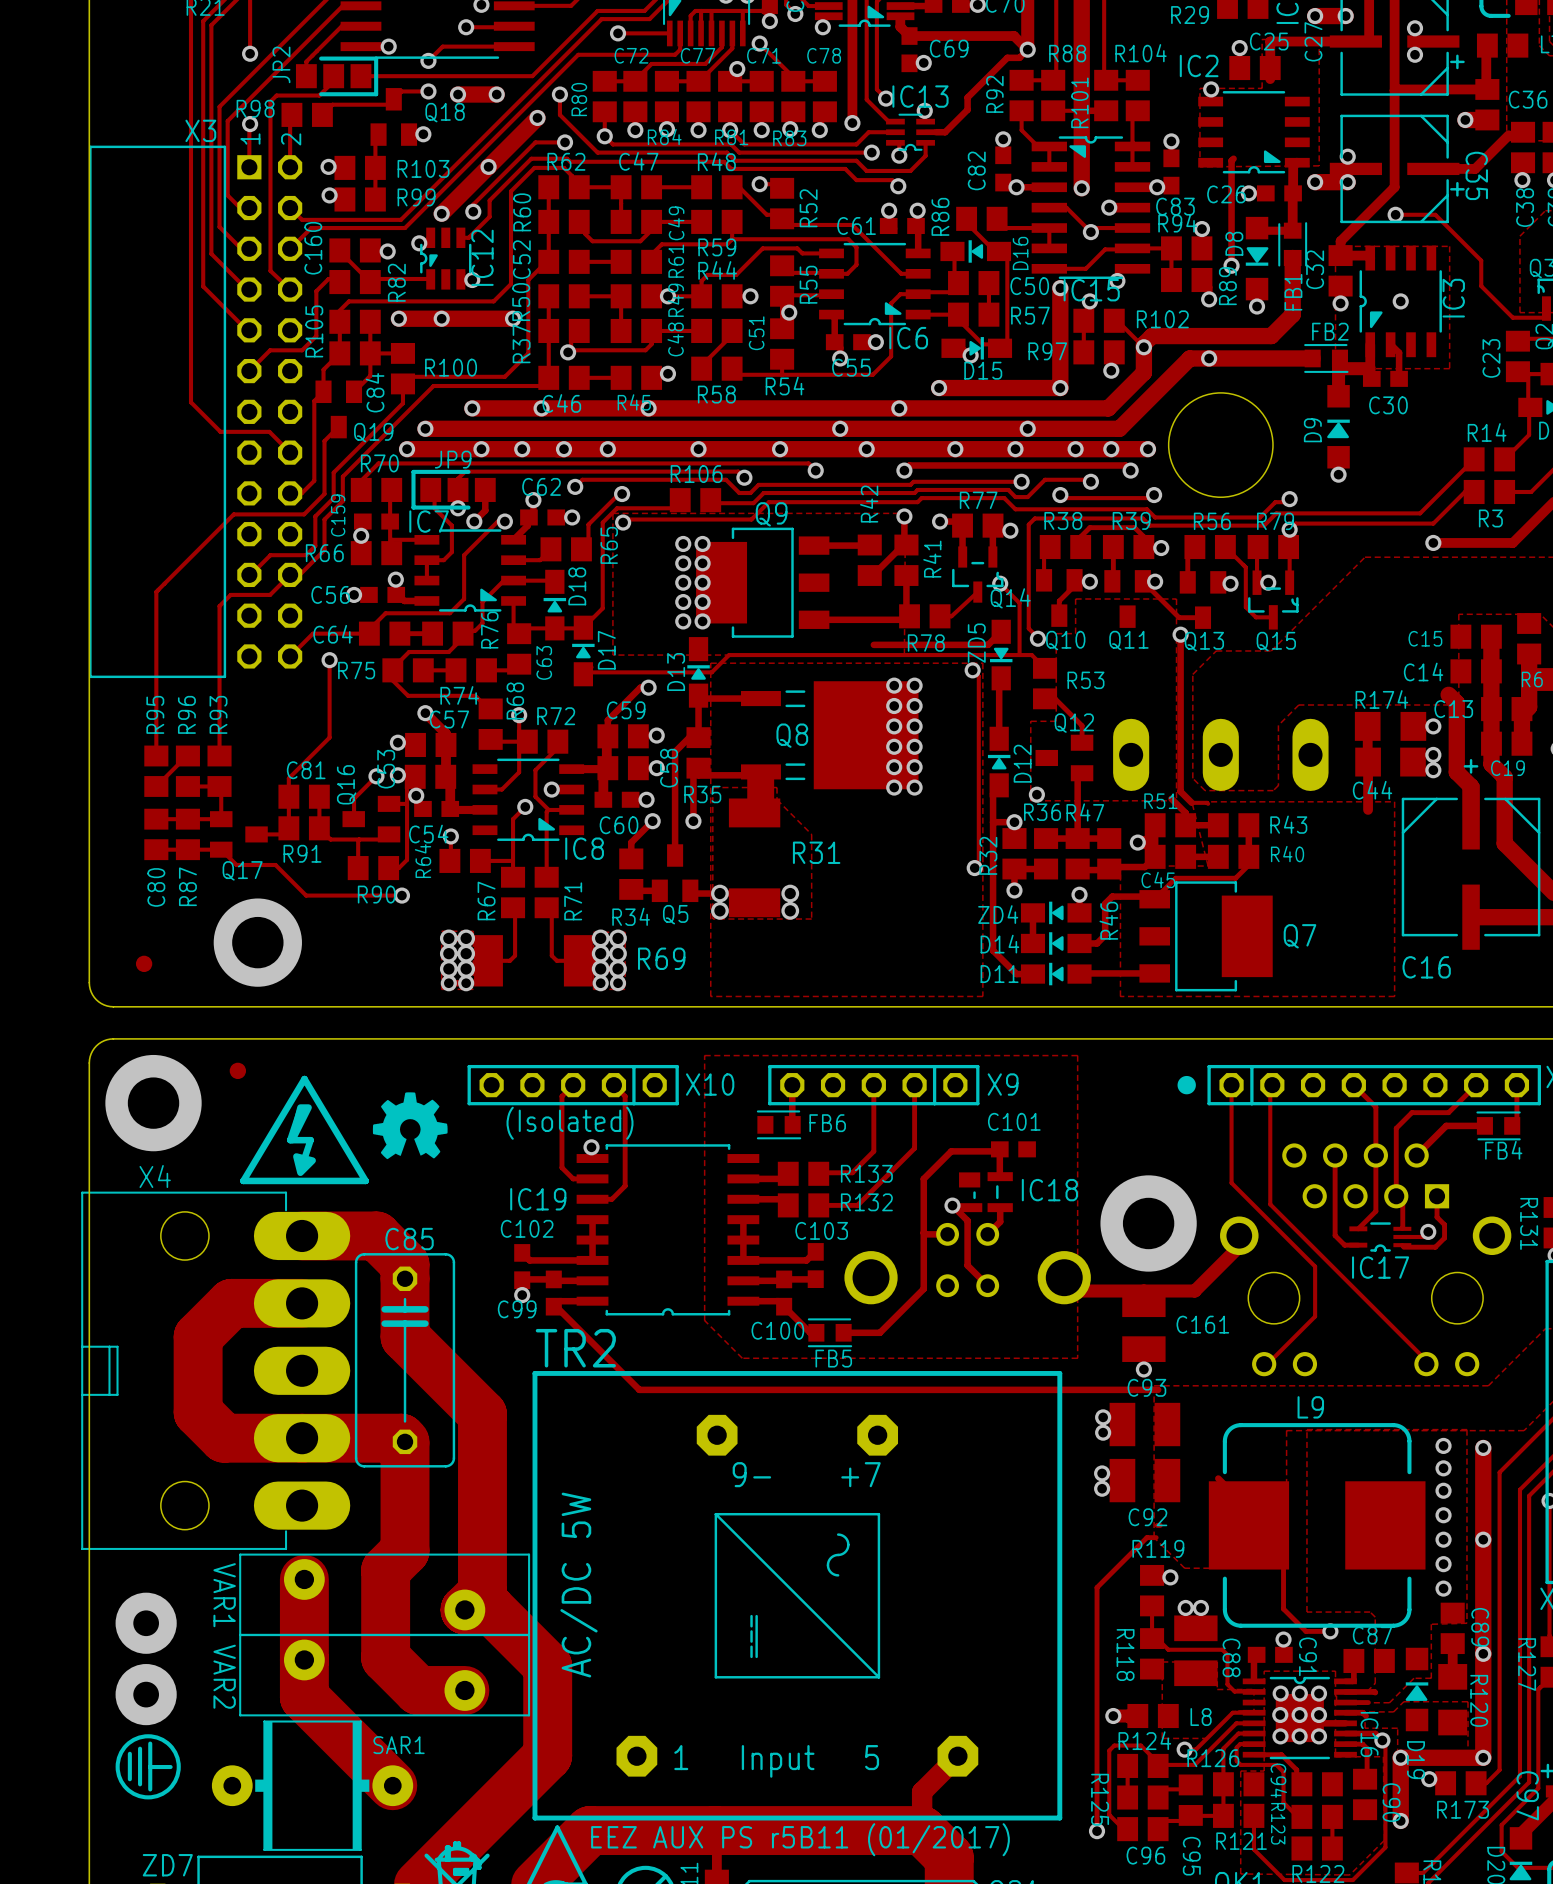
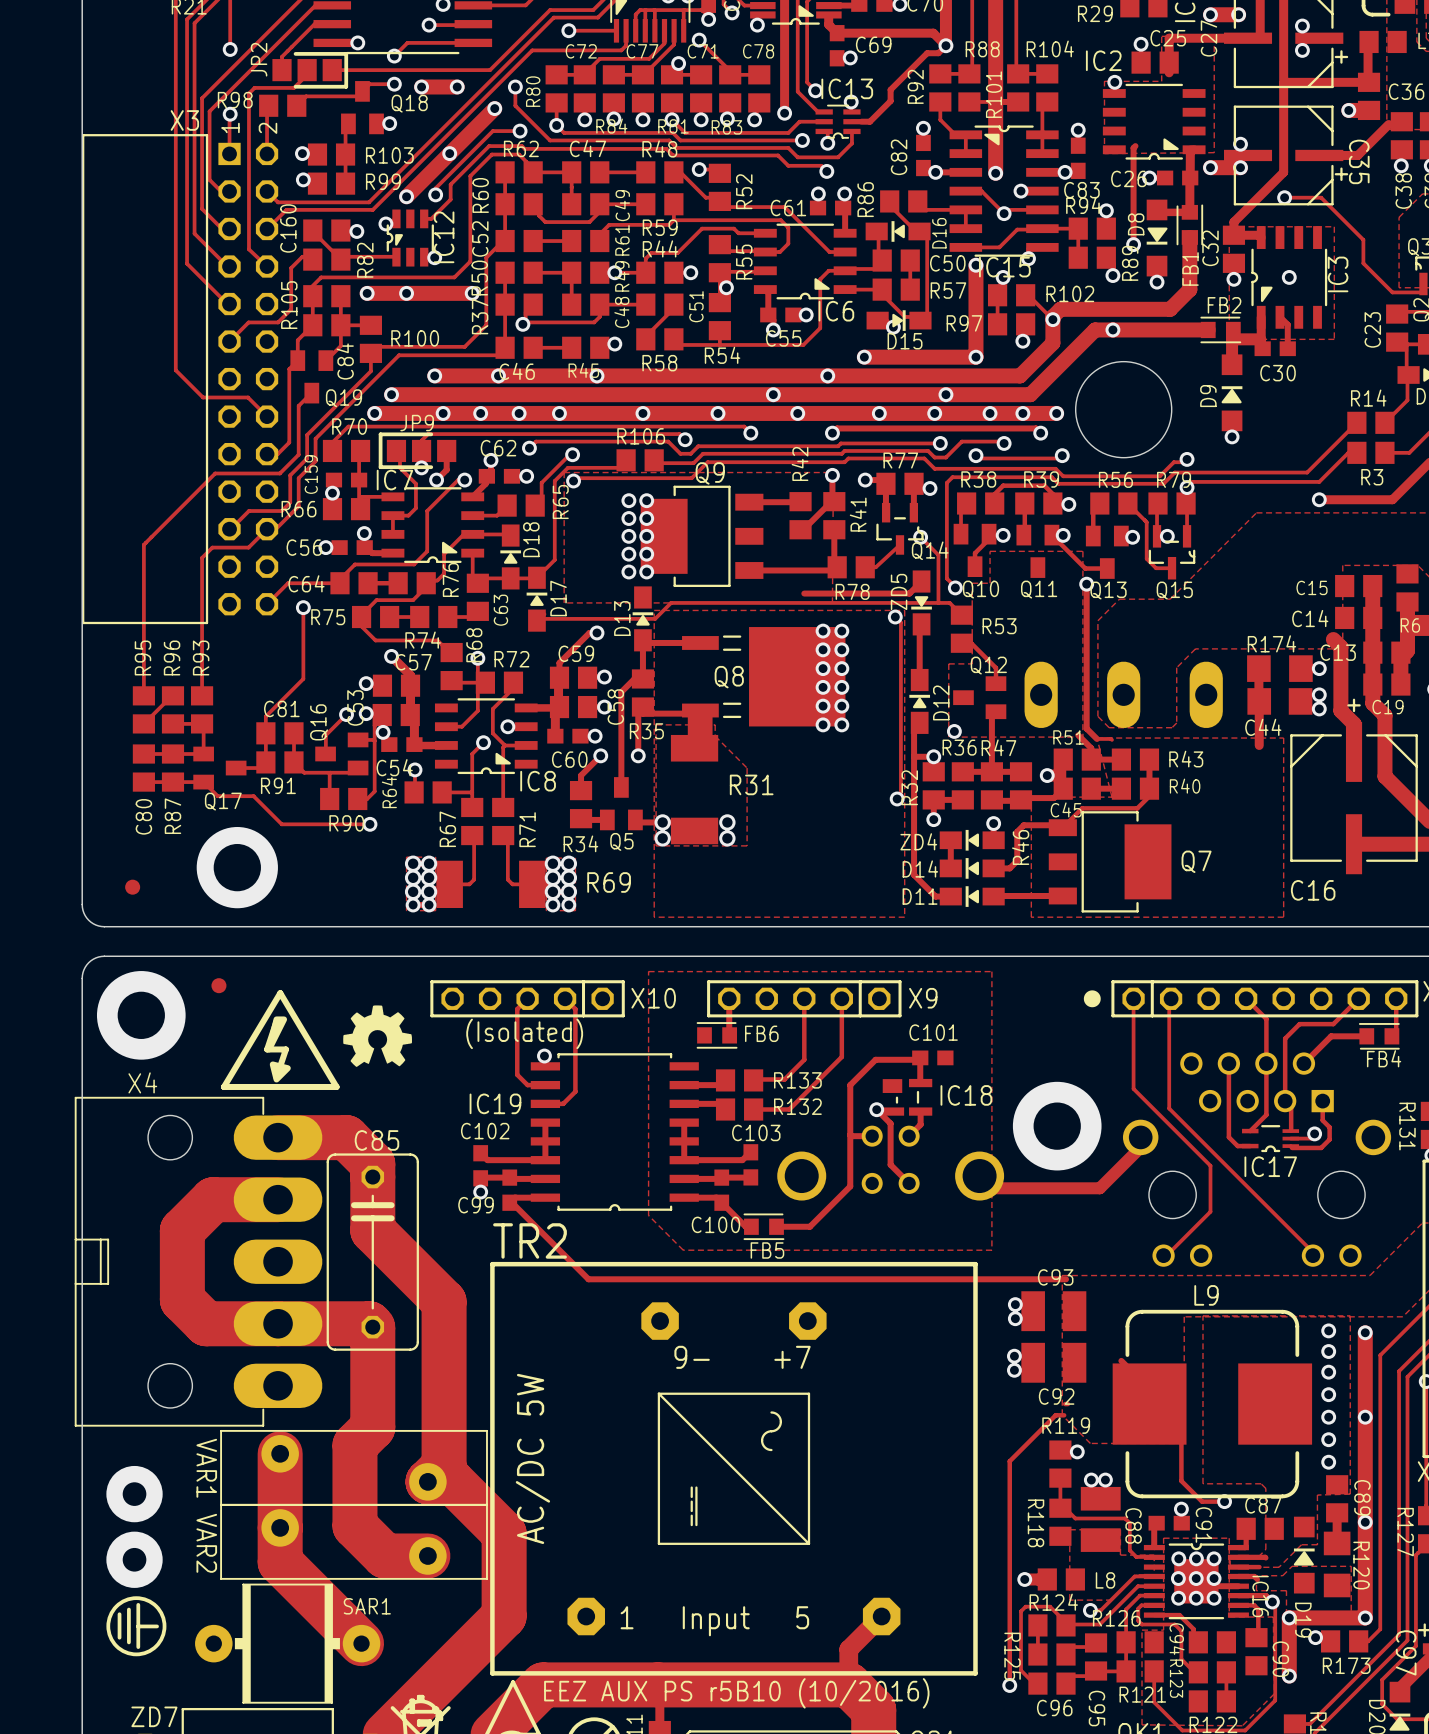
C161: (1143, 1326) -> none
via: (1143, 1369) -> none
text: EEZ AUX PS r5B11 (01/2017) (800, 1839) -> EEZ AUX PS r5B10 (10/2016) (736, 1693)

